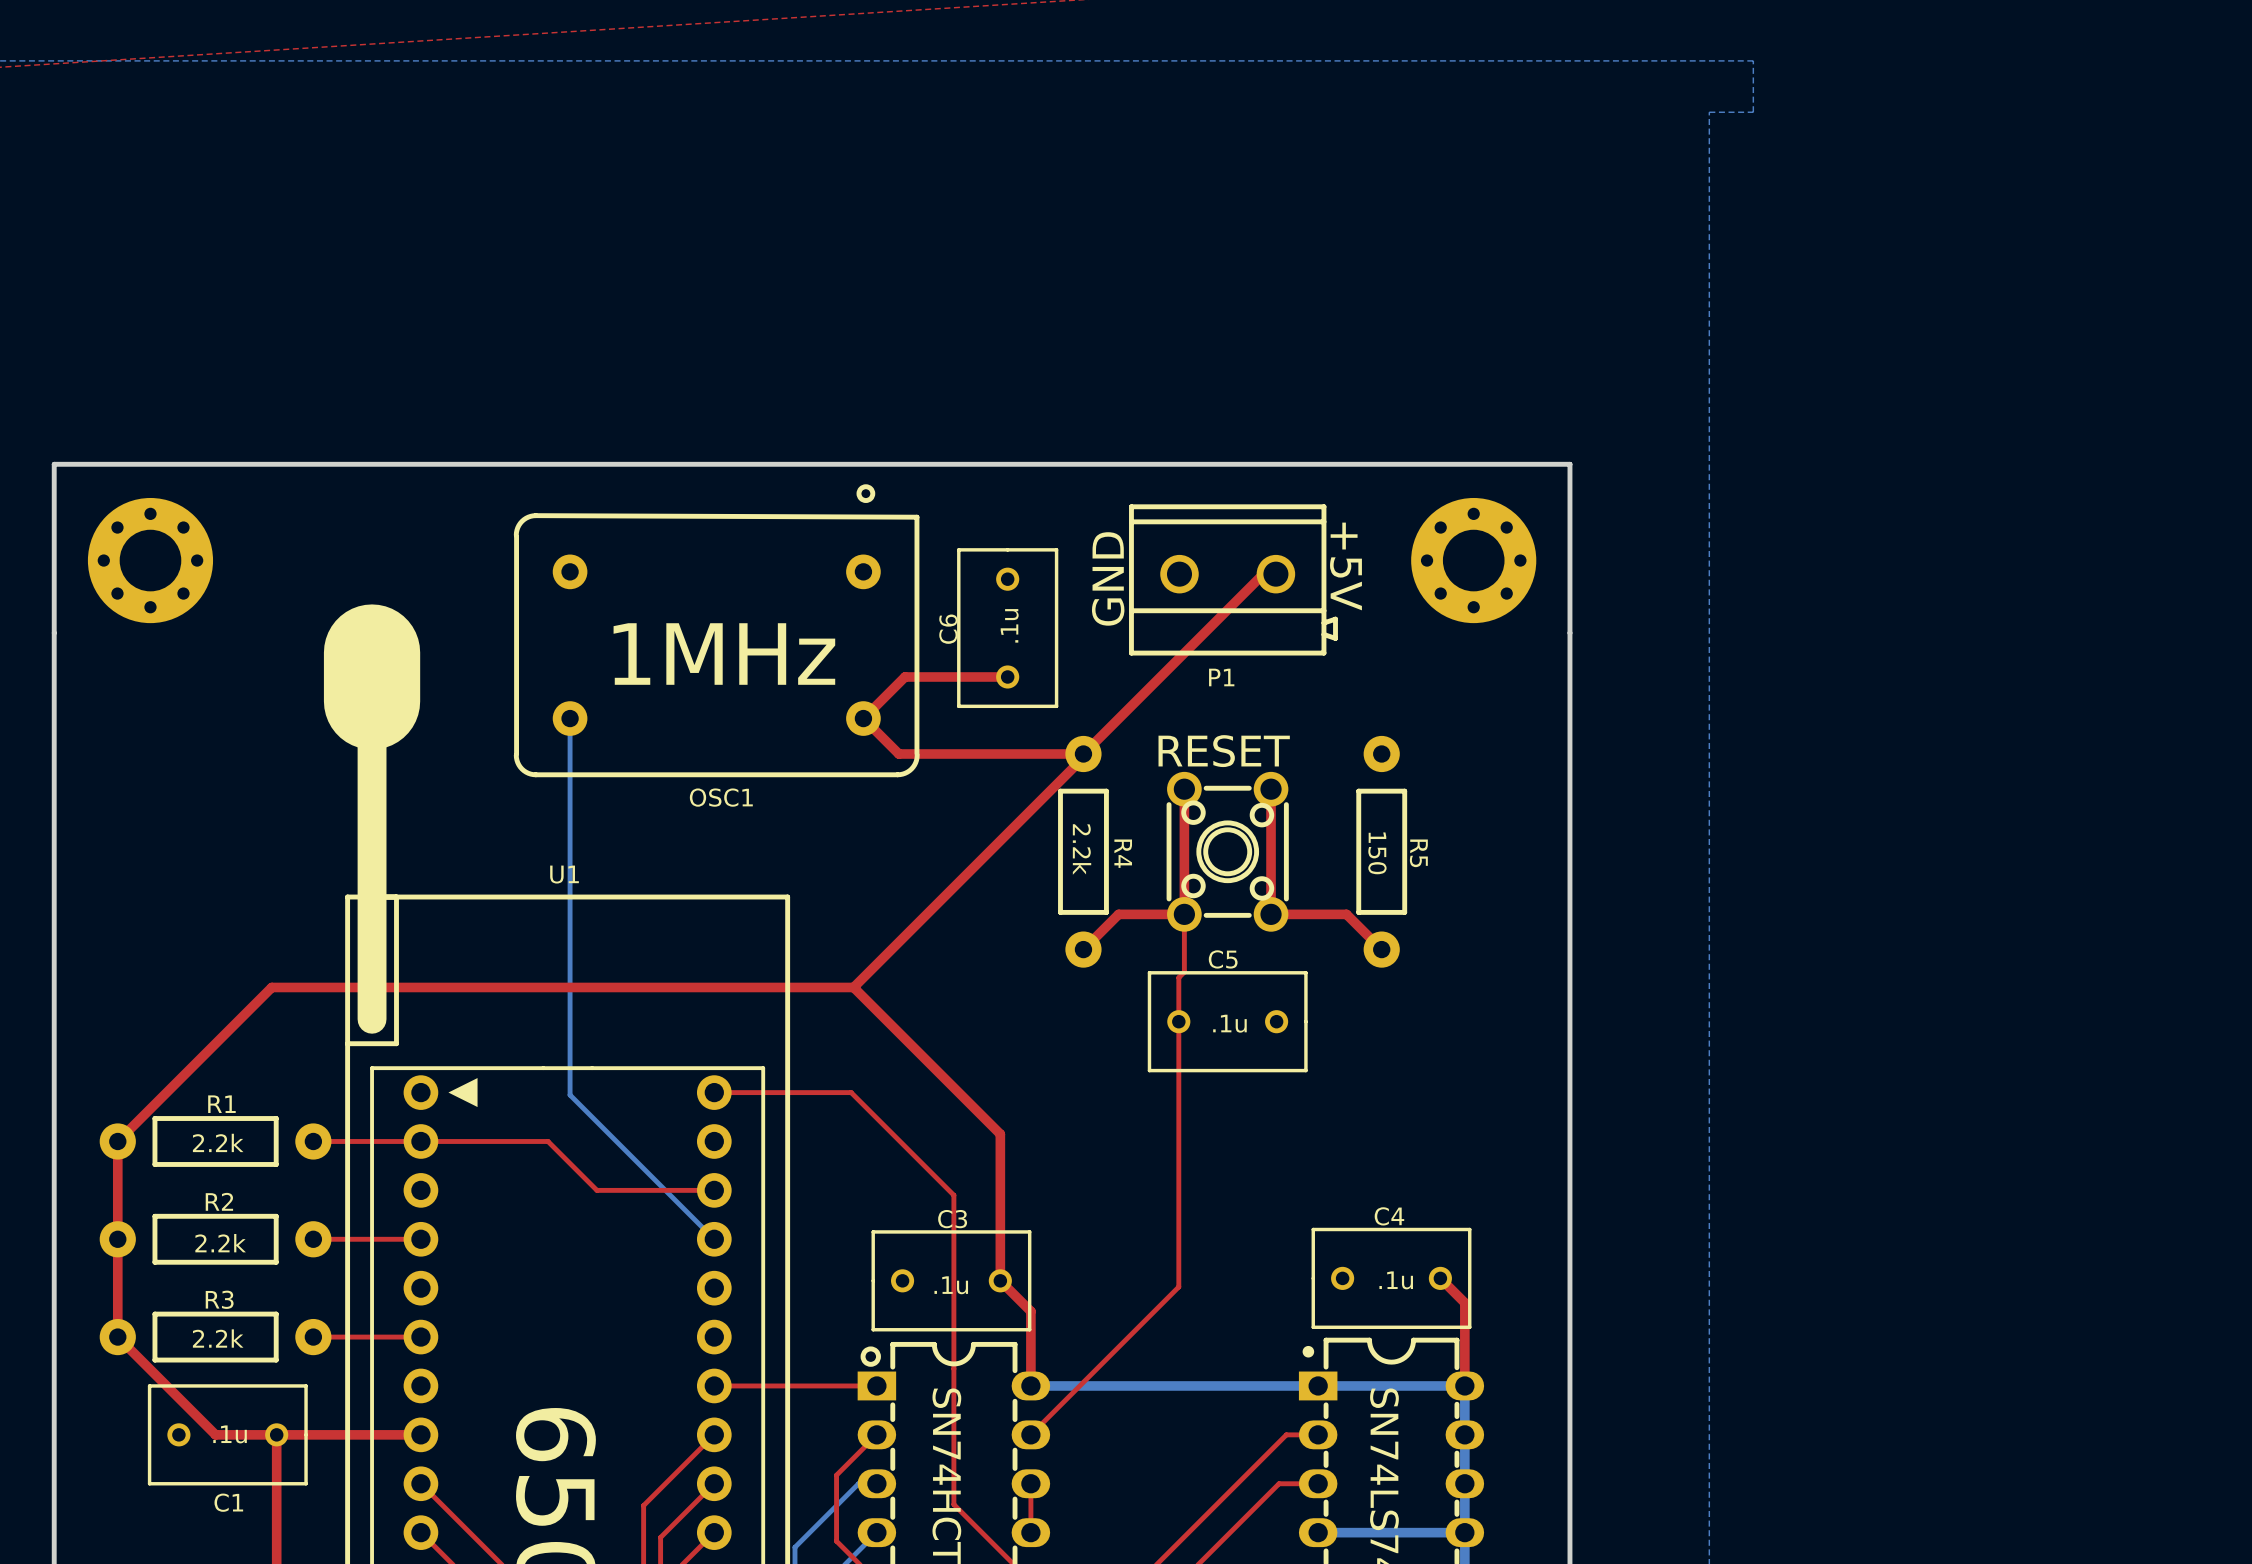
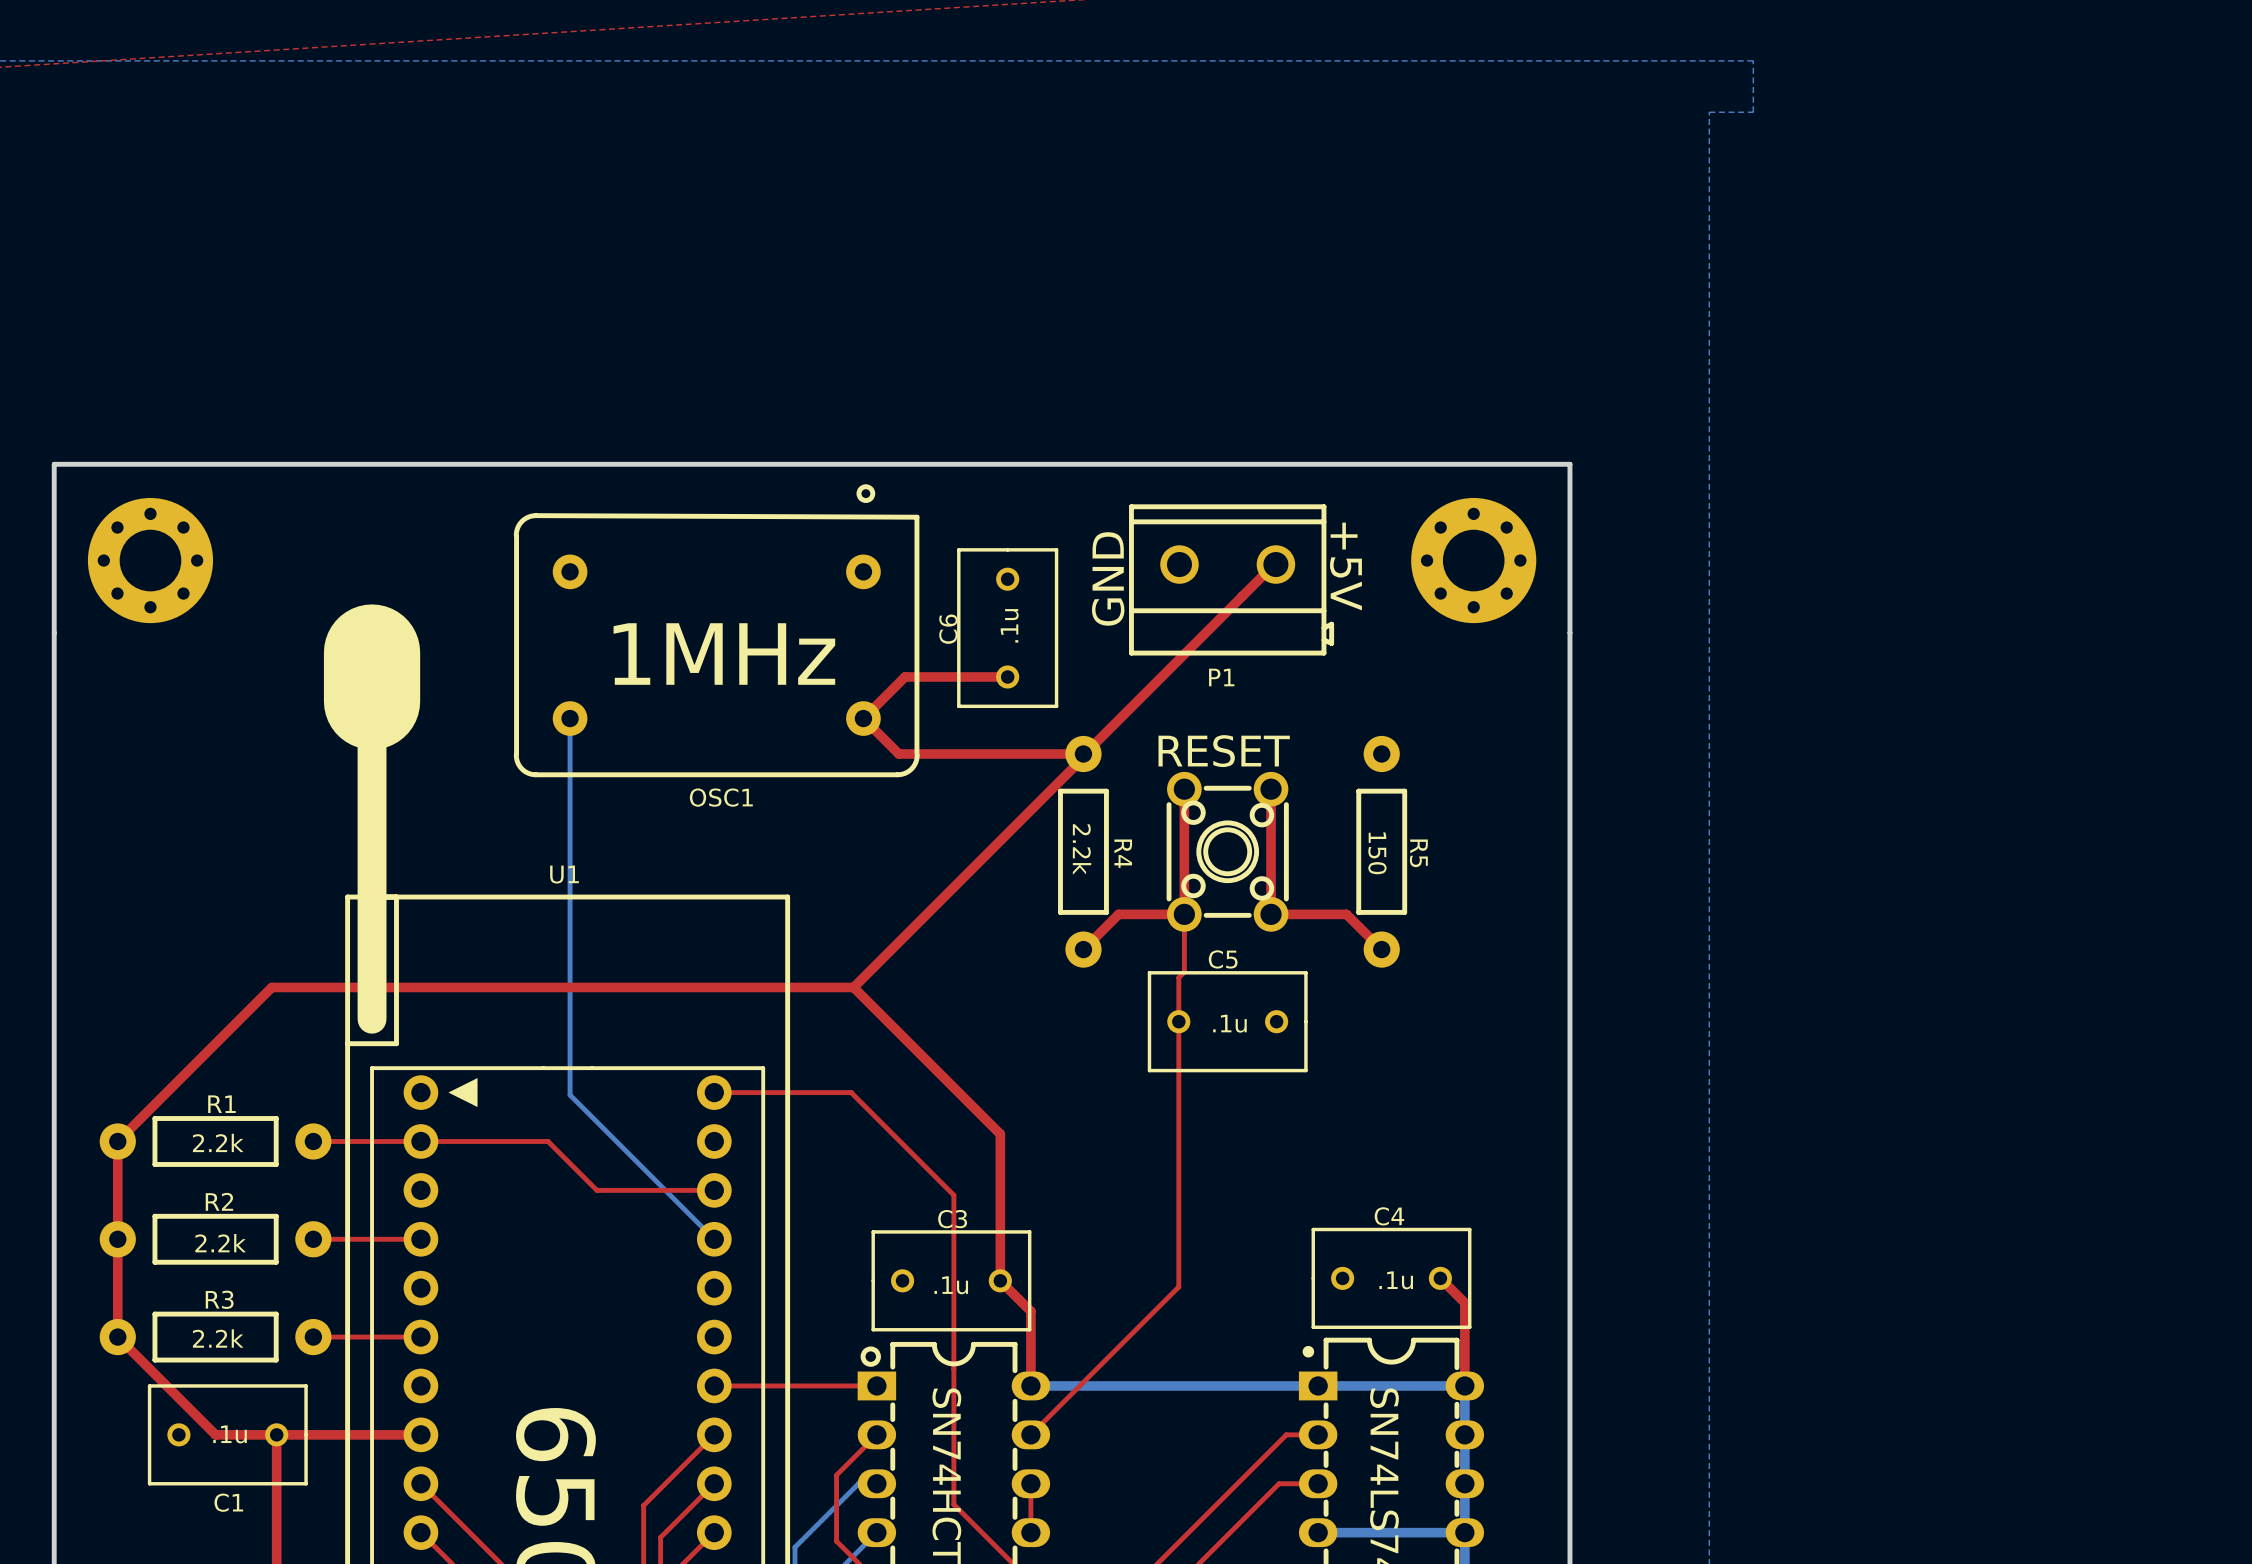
P1 footprint: [1129, 504, 1338, 656] -> [1129, 504, 1335, 656]
top track: none -> (1274, 564) (1085, 752)
top track: (1275, 574) (1263, 574) (1083, 754) -> none

